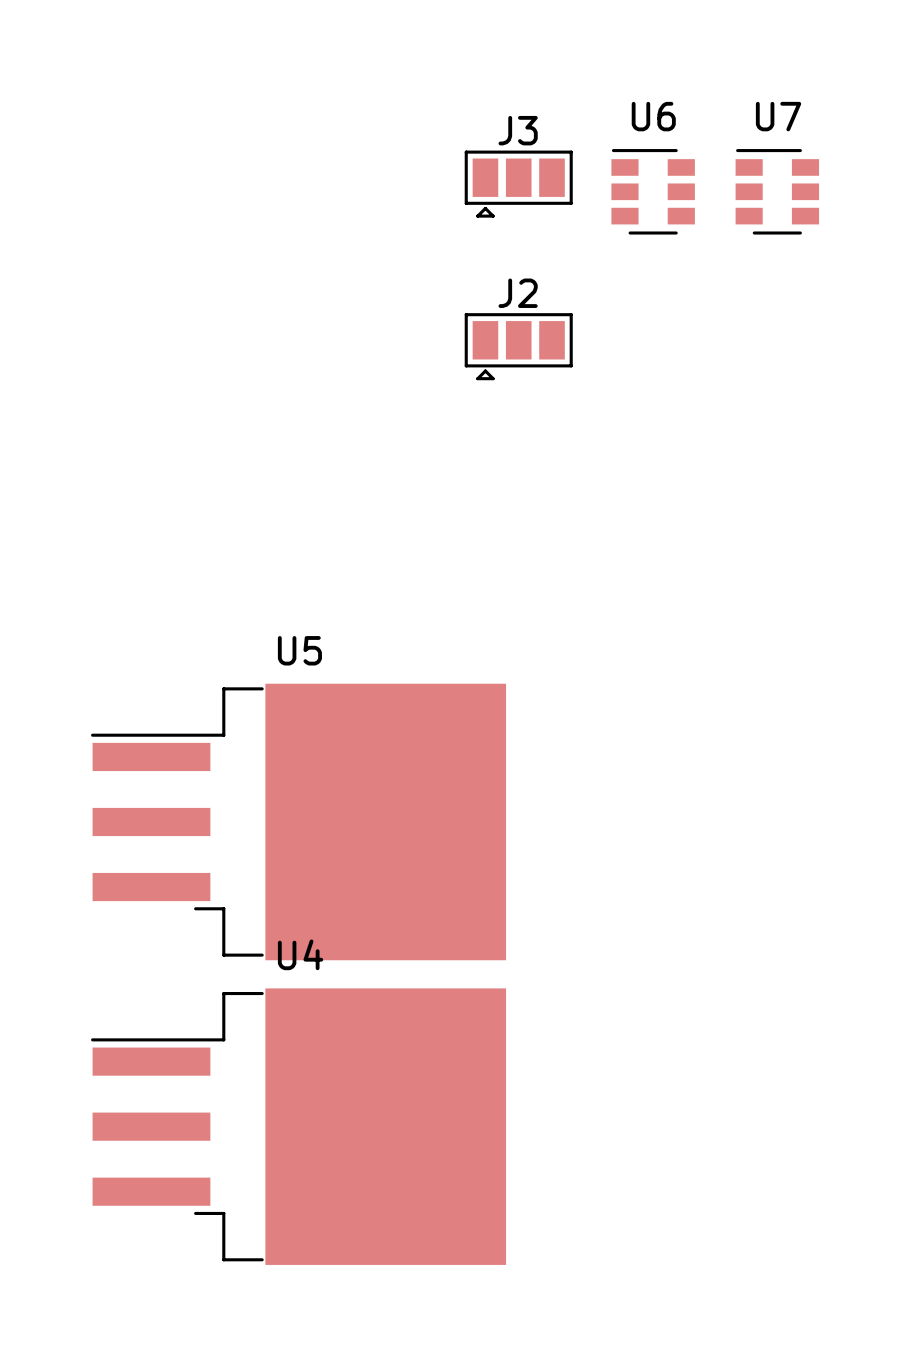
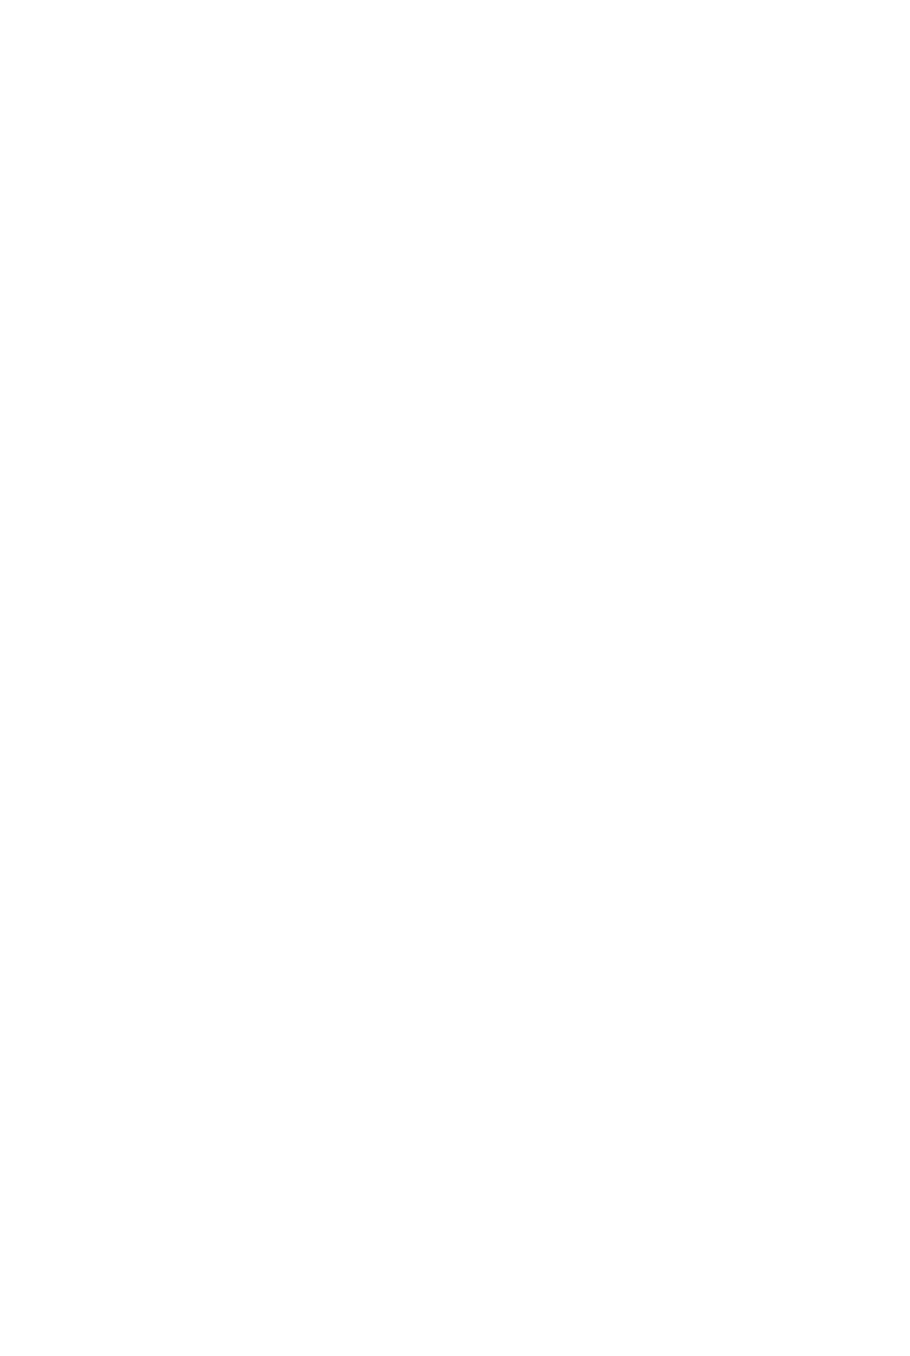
J3: (518, 184) -> none
U6: (653, 191) -> none
U7: (777, 191) -> none
J2: (518, 346) -> none
U5: (298, 821) -> none
U4: (298, 1126) -> none

